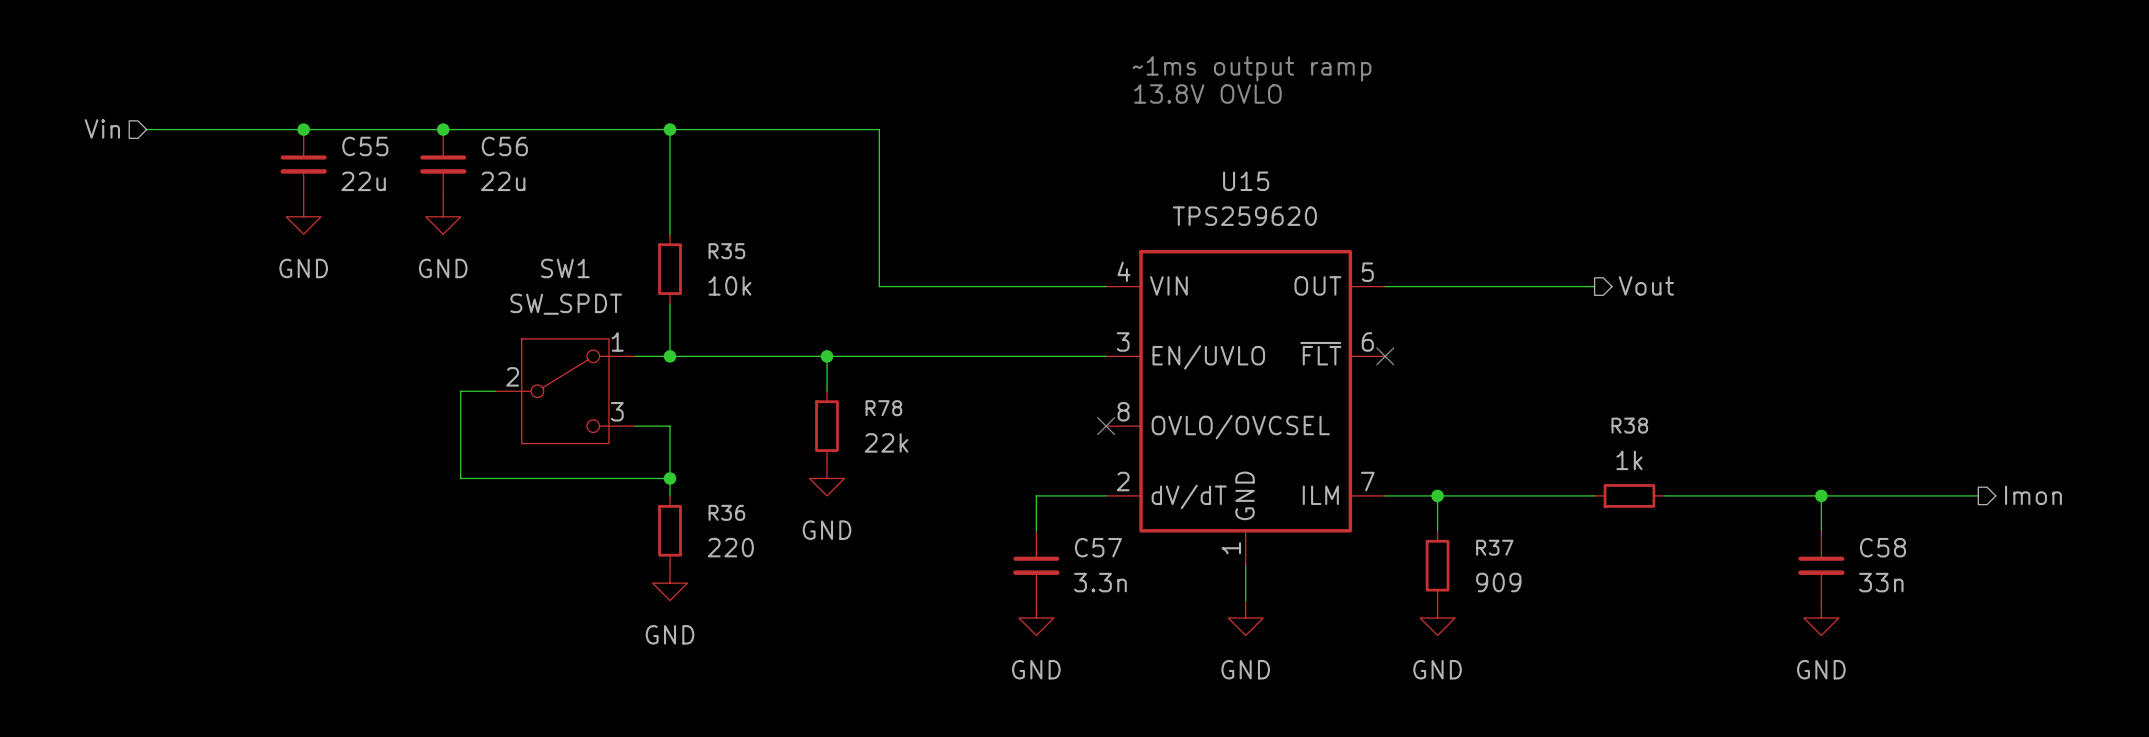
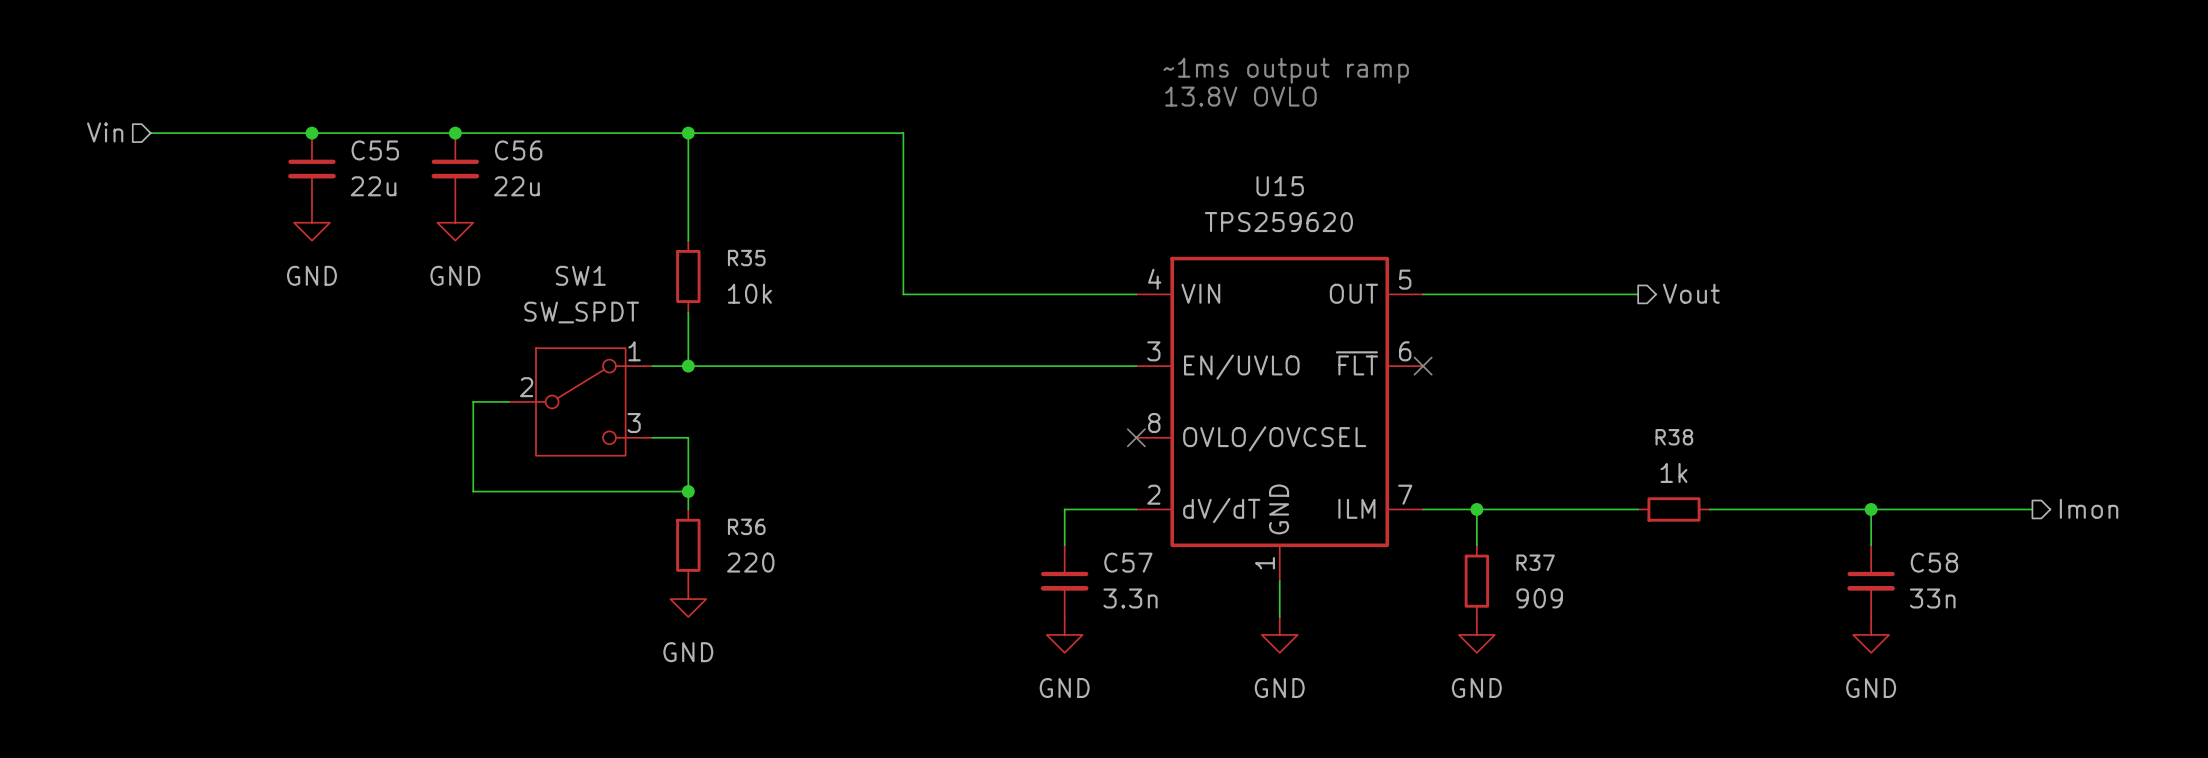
wire: (827, 356) (827, 391) -> none
junction: (827, 356) -> none
R78: 22k (827, 426) -> none
power symbol: GND (827, 478) -> none

